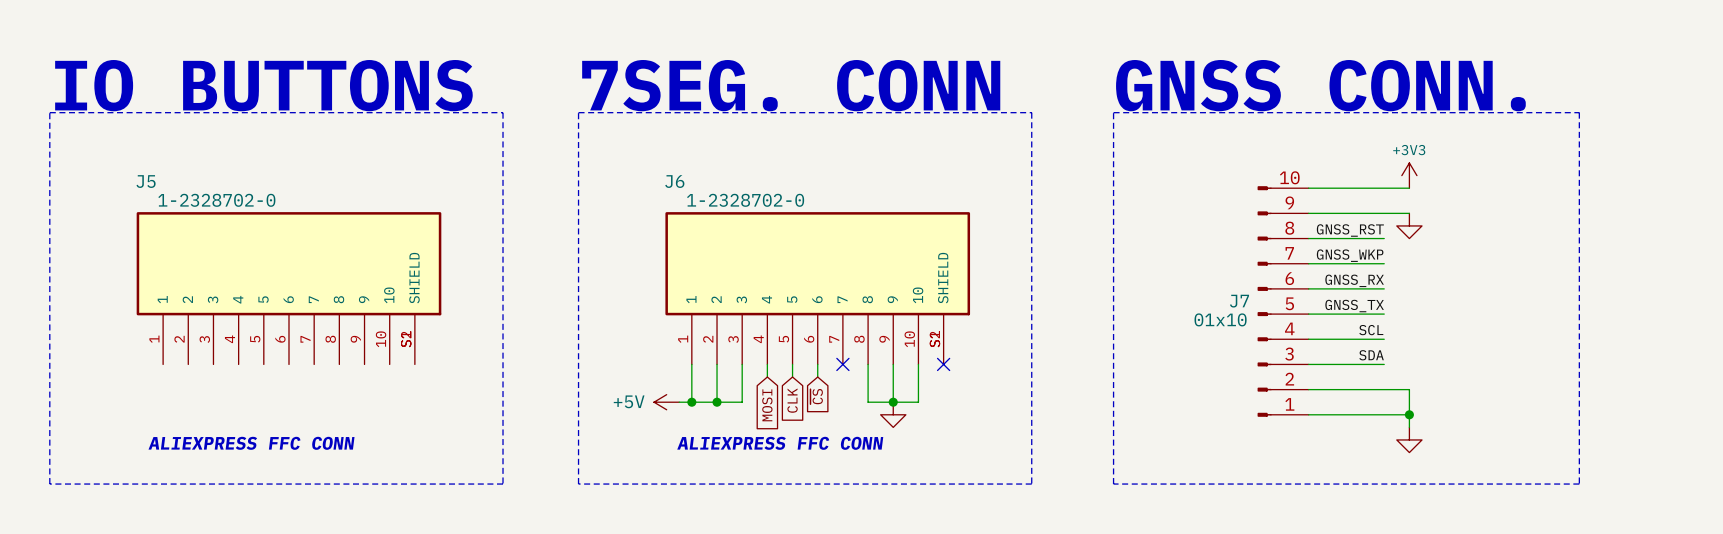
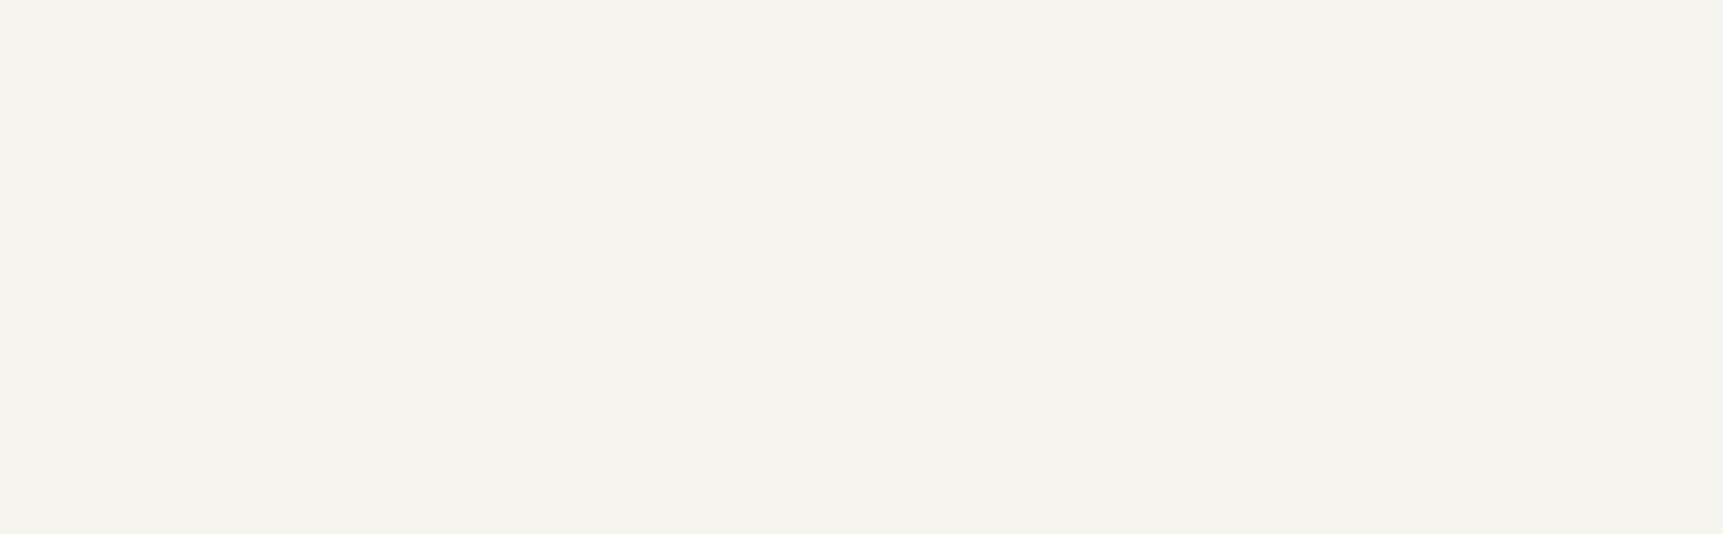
text: IO BUTTONS (263, 85) -> none
text: 7SEG. CONN (791, 85) -> none
text: GNSS CONN. (1320, 85) -> none
line: (49, 112) (503, 112) (503, 484) (49, 484) (49, 112) -> none
line: (578, 112) (1031, 112) (1031, 484) (578, 484) (578, 112) -> none
line: (1113, 112) (1579, 112) (1579, 484) (1113, 484) (1113, 112) -> none
power symbol: +3V3 (1409, 175) -> none
wire: (1308, 188) (1409, 188) -> none
wire: (1308, 213) (1409, 213) -> none
power symbol: (1409, 225) -> none
label: GNSS_RST (1350, 230) -> none
wire: (1308, 238) (1384, 238) -> none
label: GNSS_WKP (1350, 255) -> none
wire: (1308, 263) (1384, 263) -> none
label: GNSS_RX (1354, 280) -> none
J5: 1-2328702-0 (288, 288) -> none
J6: 1-2328702-0 (817, 288) -> none
wire: (1308, 288) (1384, 288) -> none
J7: 01x10 (1283, 301) -> none
label: GNSS_TX (1354, 306) -> none
wire: (1308, 314) (1384, 314) -> none
label: SCL (1371, 330) -> none
wire: (1308, 339) (1384, 339) -> none
label: SDA (1371, 355) -> none
wire: (691, 364) (691, 402) -> none
wire: (717, 364) (717, 402) -> none
wire: (742, 364) (742, 402) (679, 402) -> none
wire: (767, 364) (767, 377) -> none
wire: (792, 364) (792, 377) -> none
wire: (817, 364) (817, 377) -> none
no-connect mark: (842, 364) -> none
wire: (868, 364) (868, 402) (918, 402) (918, 364) -> none
wire: (893, 364) (893, 402) -> none
no-connect mark: (943, 364) -> none
wire: (1308, 364) (1384, 364) -> none
wire: (1308, 389) (1409, 389) (1409, 427) -> none
global label: ~{CS} (816, 396) -> none
global label: CLK (792, 400) -> none
power symbol: +5V (666, 402) -> none
junction: (691, 402) -> none
junction: (717, 402) -> none
junction: (893, 402) -> none
global label: MOSI (767, 405) -> none
power symbol: (893, 414) -> none
wire: (1308, 414) (1409, 414) -> none
junction: (1409, 414) -> none
power symbol: (1409, 439) -> none
text: ALIEXPRESS FFC CONN (251, 443) -> none
text: ALIEXPRESS FFC CONN (780, 443) -> none

